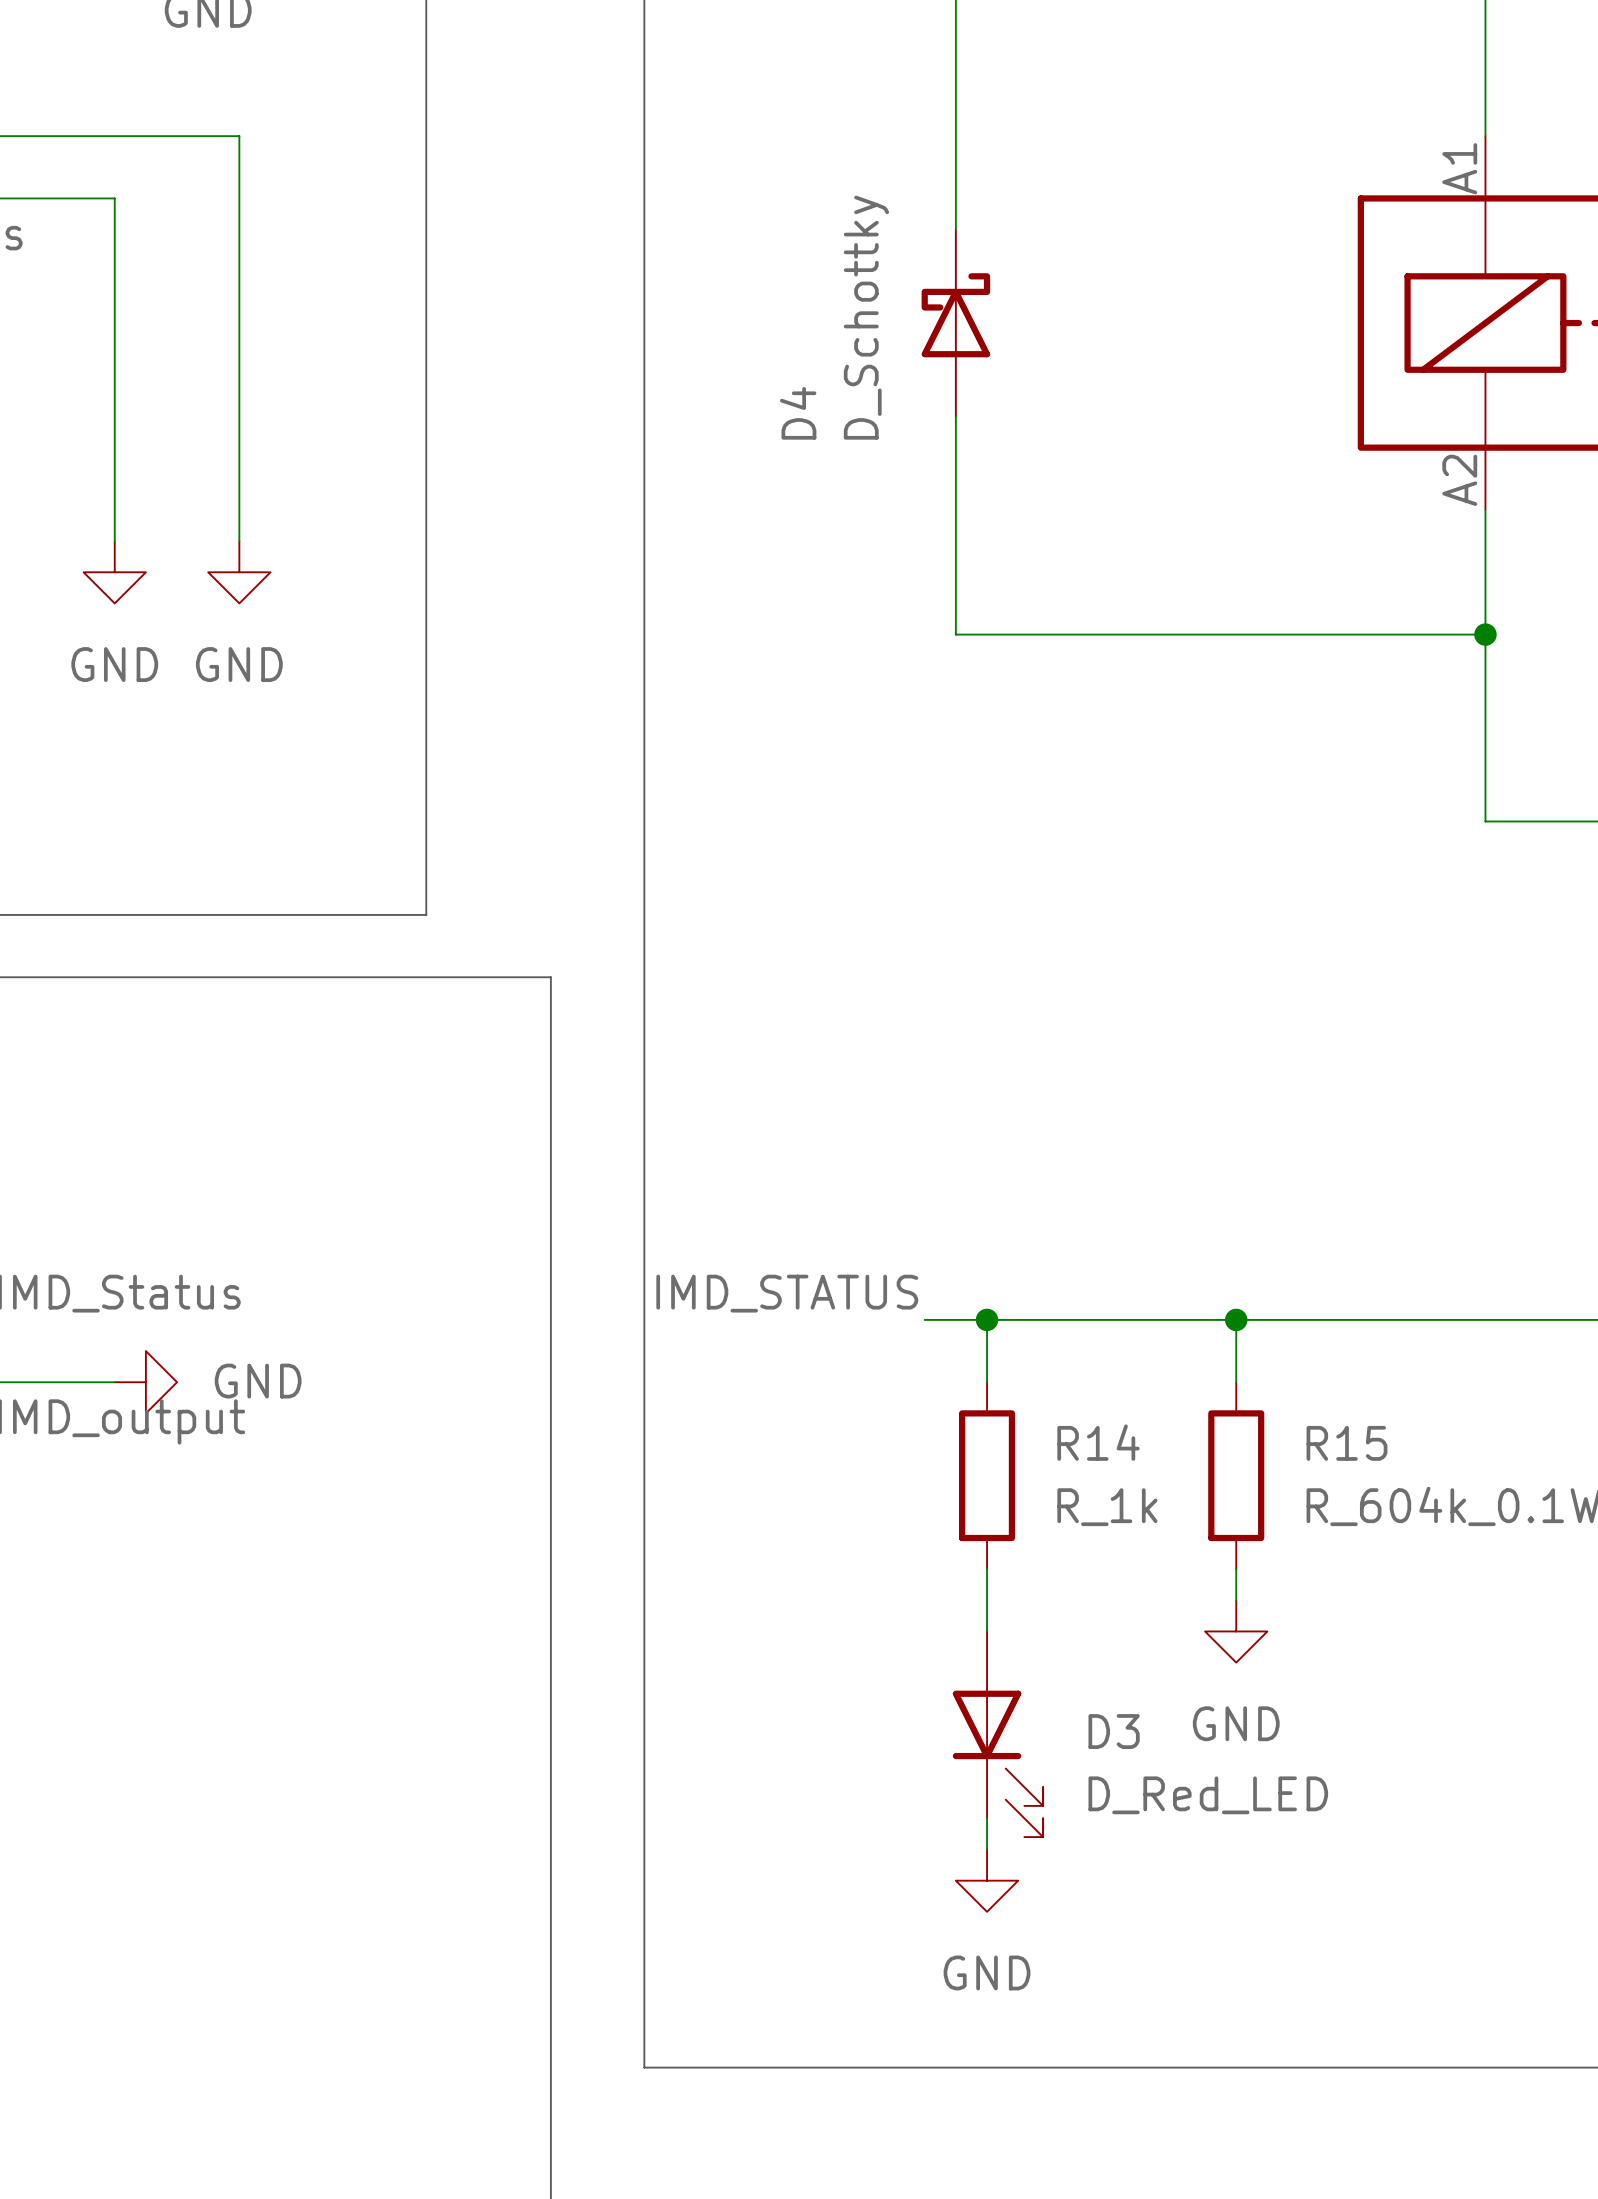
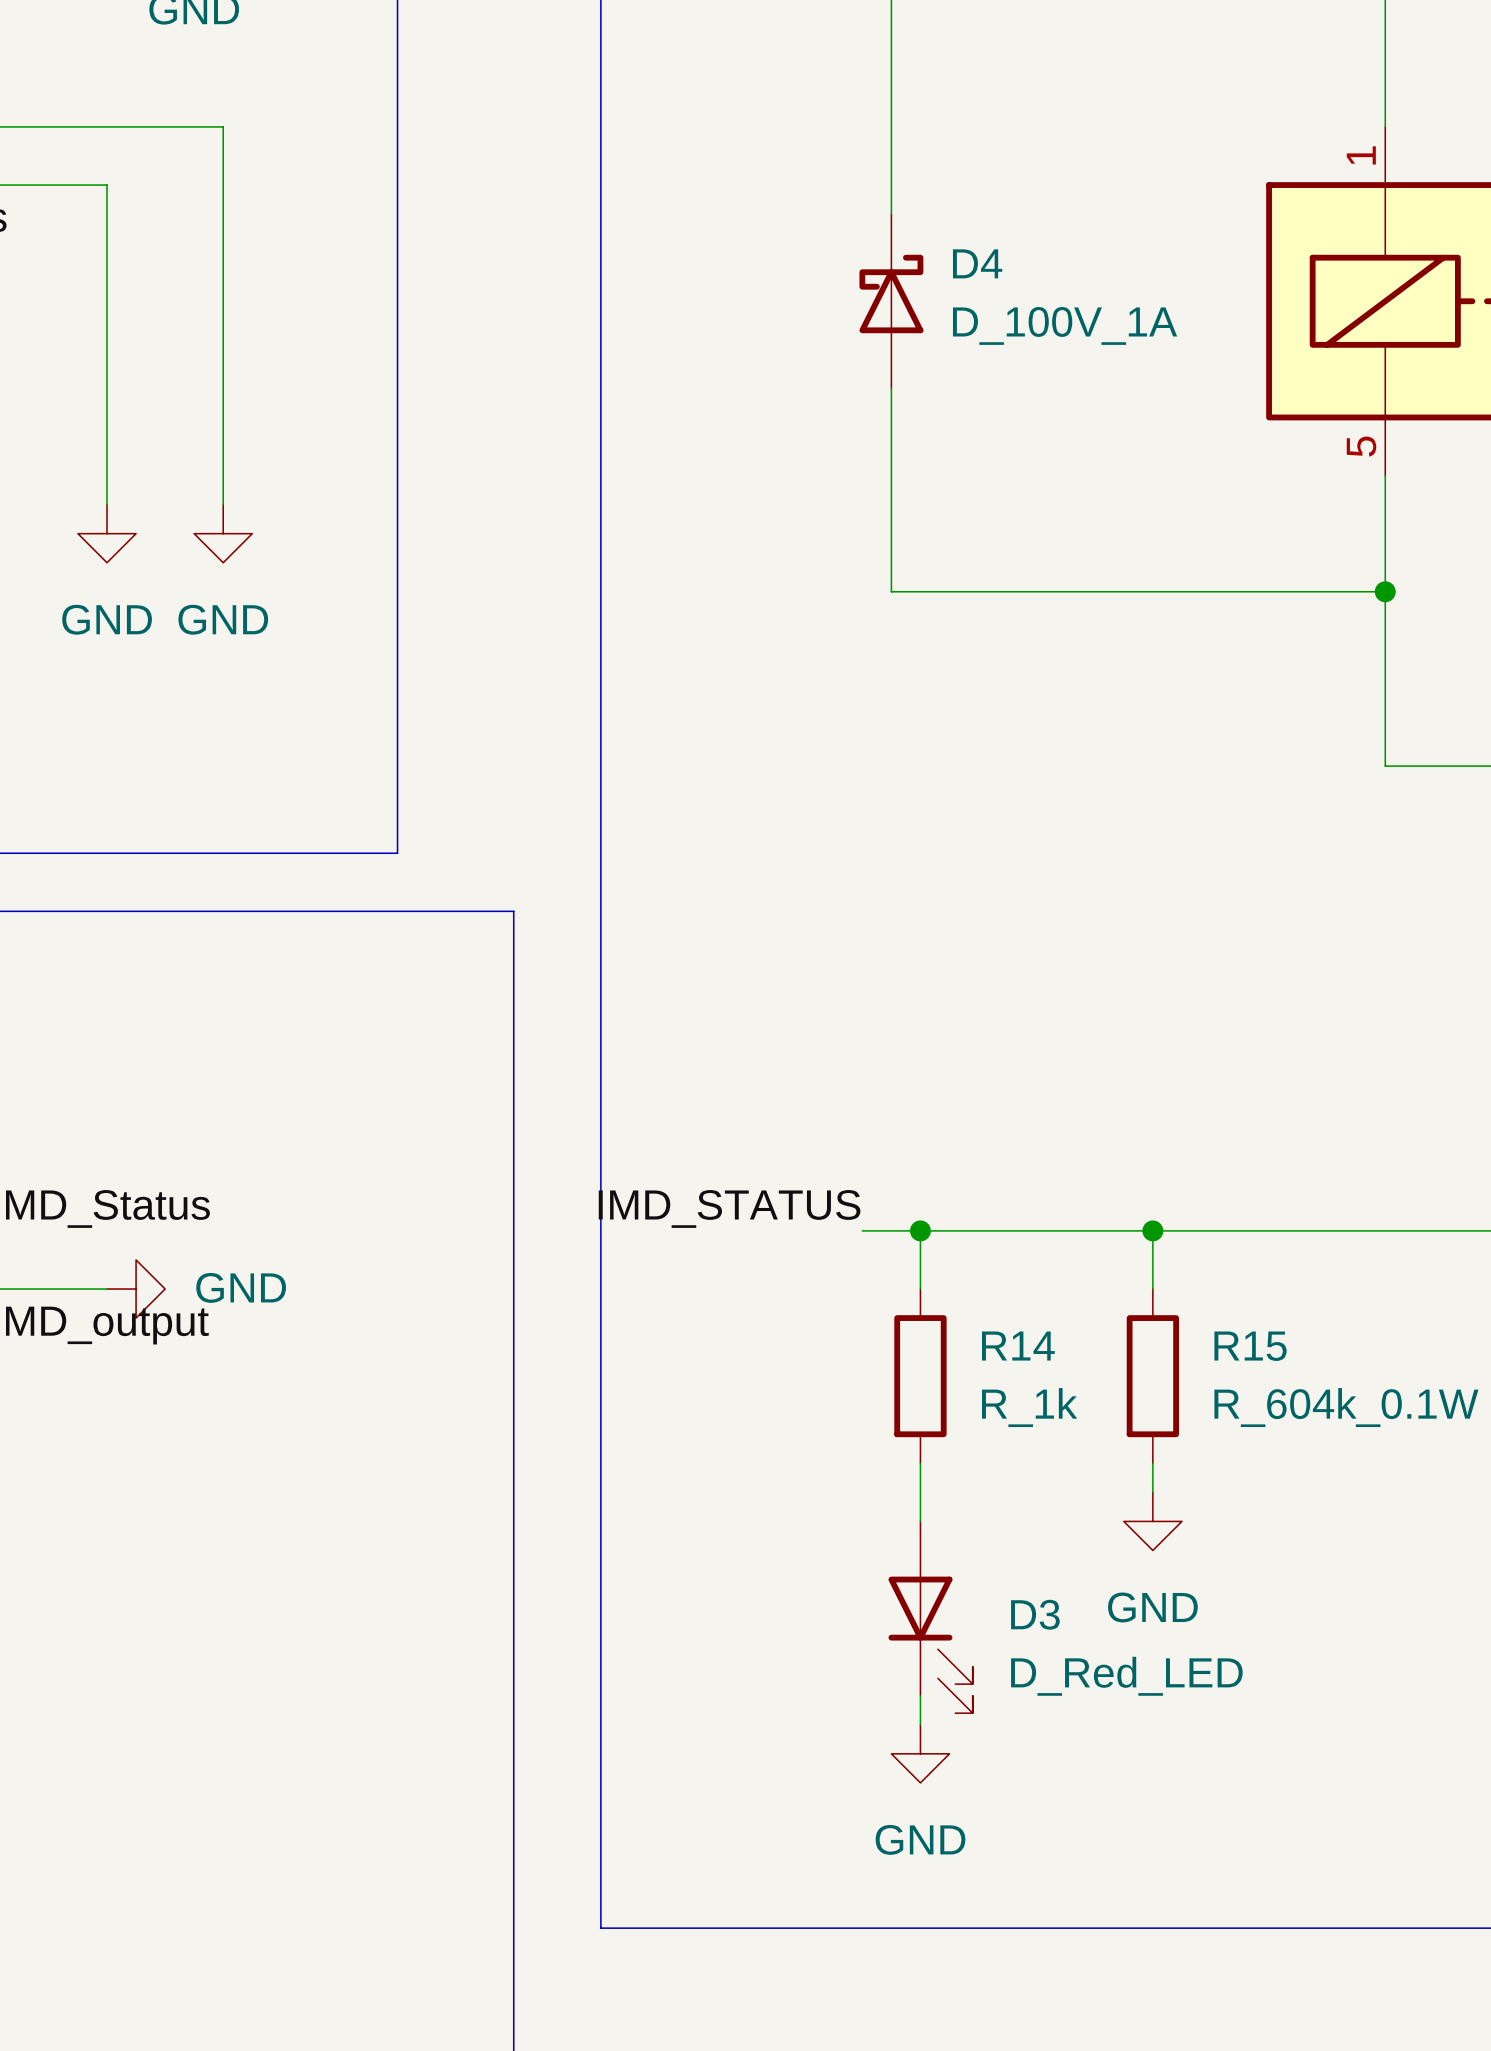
part pin number: A1 (1459, 168) -> 1 (1361, 155)
D4 value: D_Schottky (866, 317) -> D_100V_1A (1065, 325)
D4 name rotation: 0° (798, 413) -> 90° clockwise (977, 263)
D4 name position: D4 (798, 413) -> D4 (977, 263)
part pin number: A2 (1459, 480) -> 5 (1361, 446)

